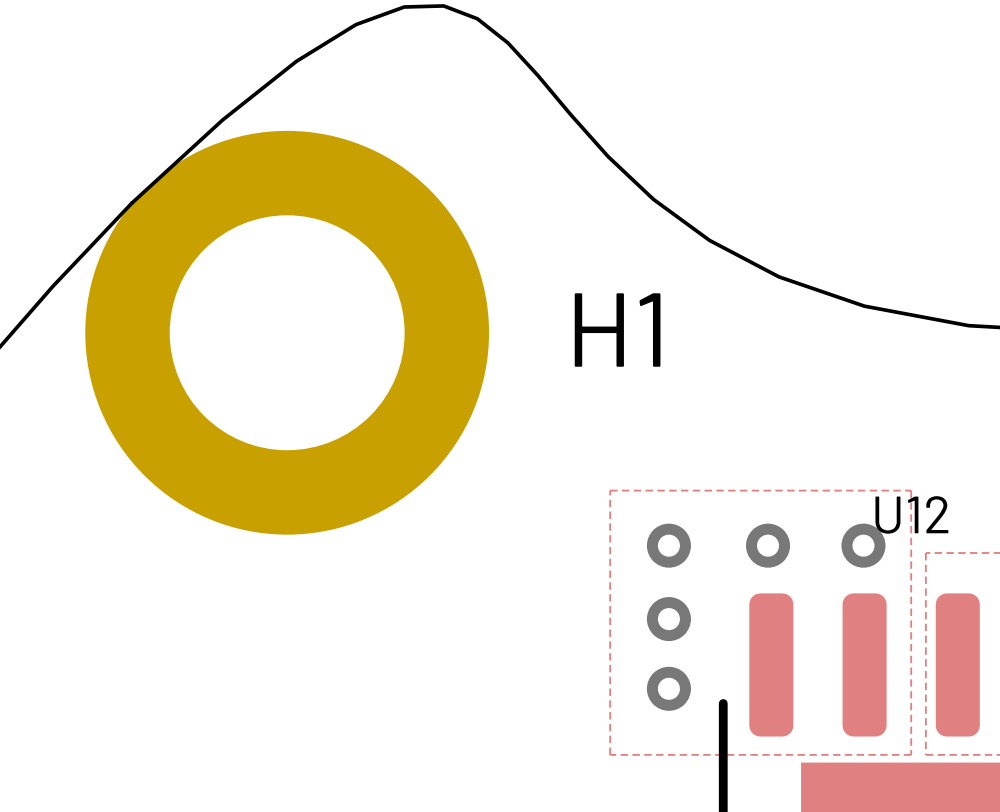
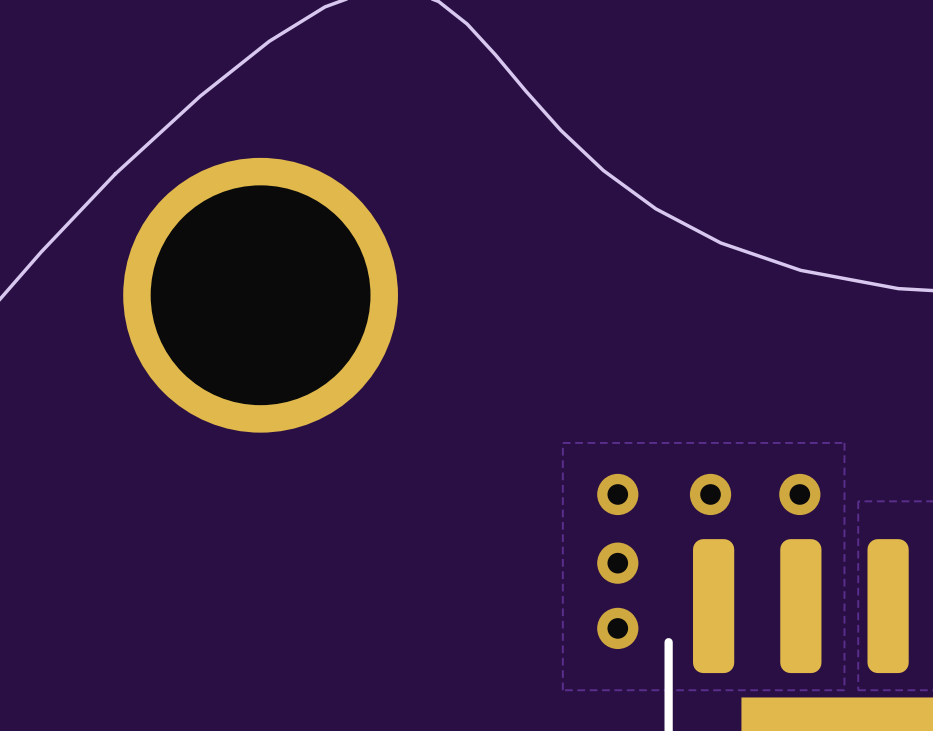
H1: (287, 332) -> none
part: none -> (260, 295)
U12 name: U12 (911, 514) -> none

